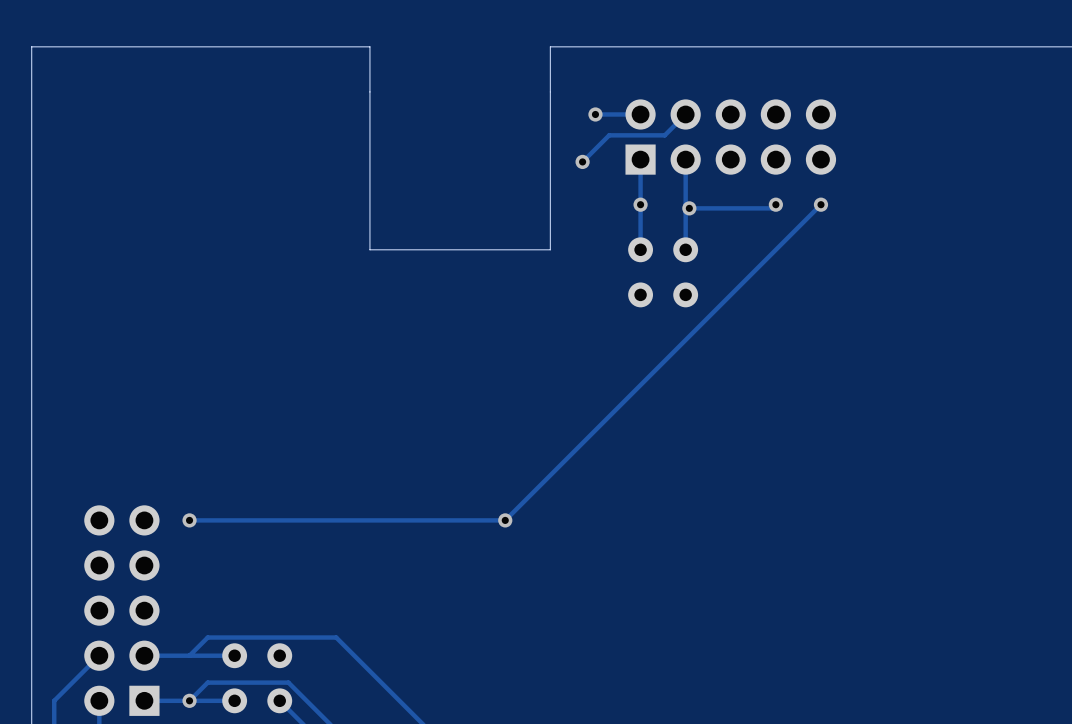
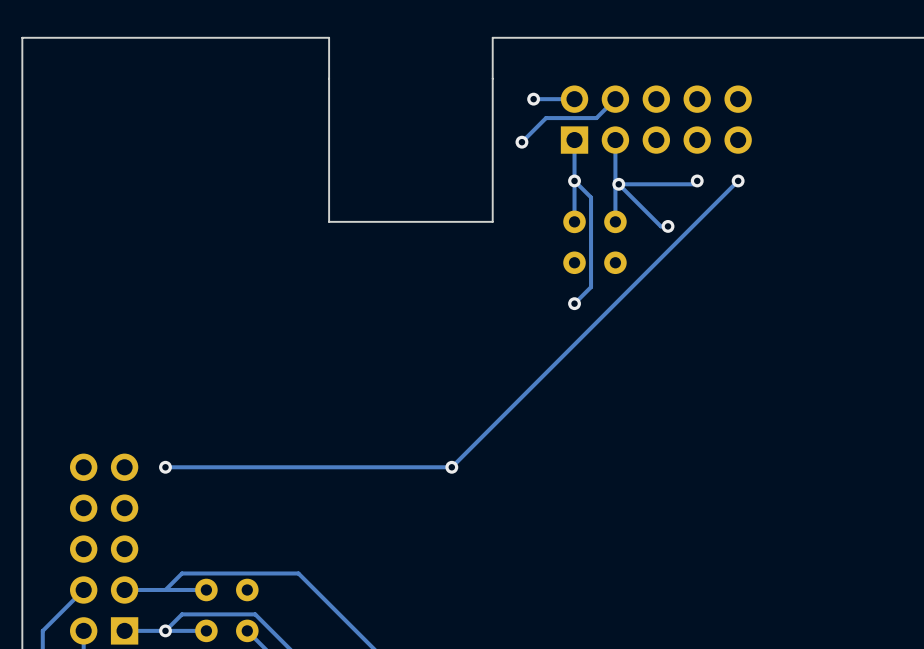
track: none -> (574, 180) (591, 197) (591, 287) (574, 303)
track: none -> (618, 184) (660, 226) (668, 226)
via: none -> (668, 226)
via: none -> (574, 303)

